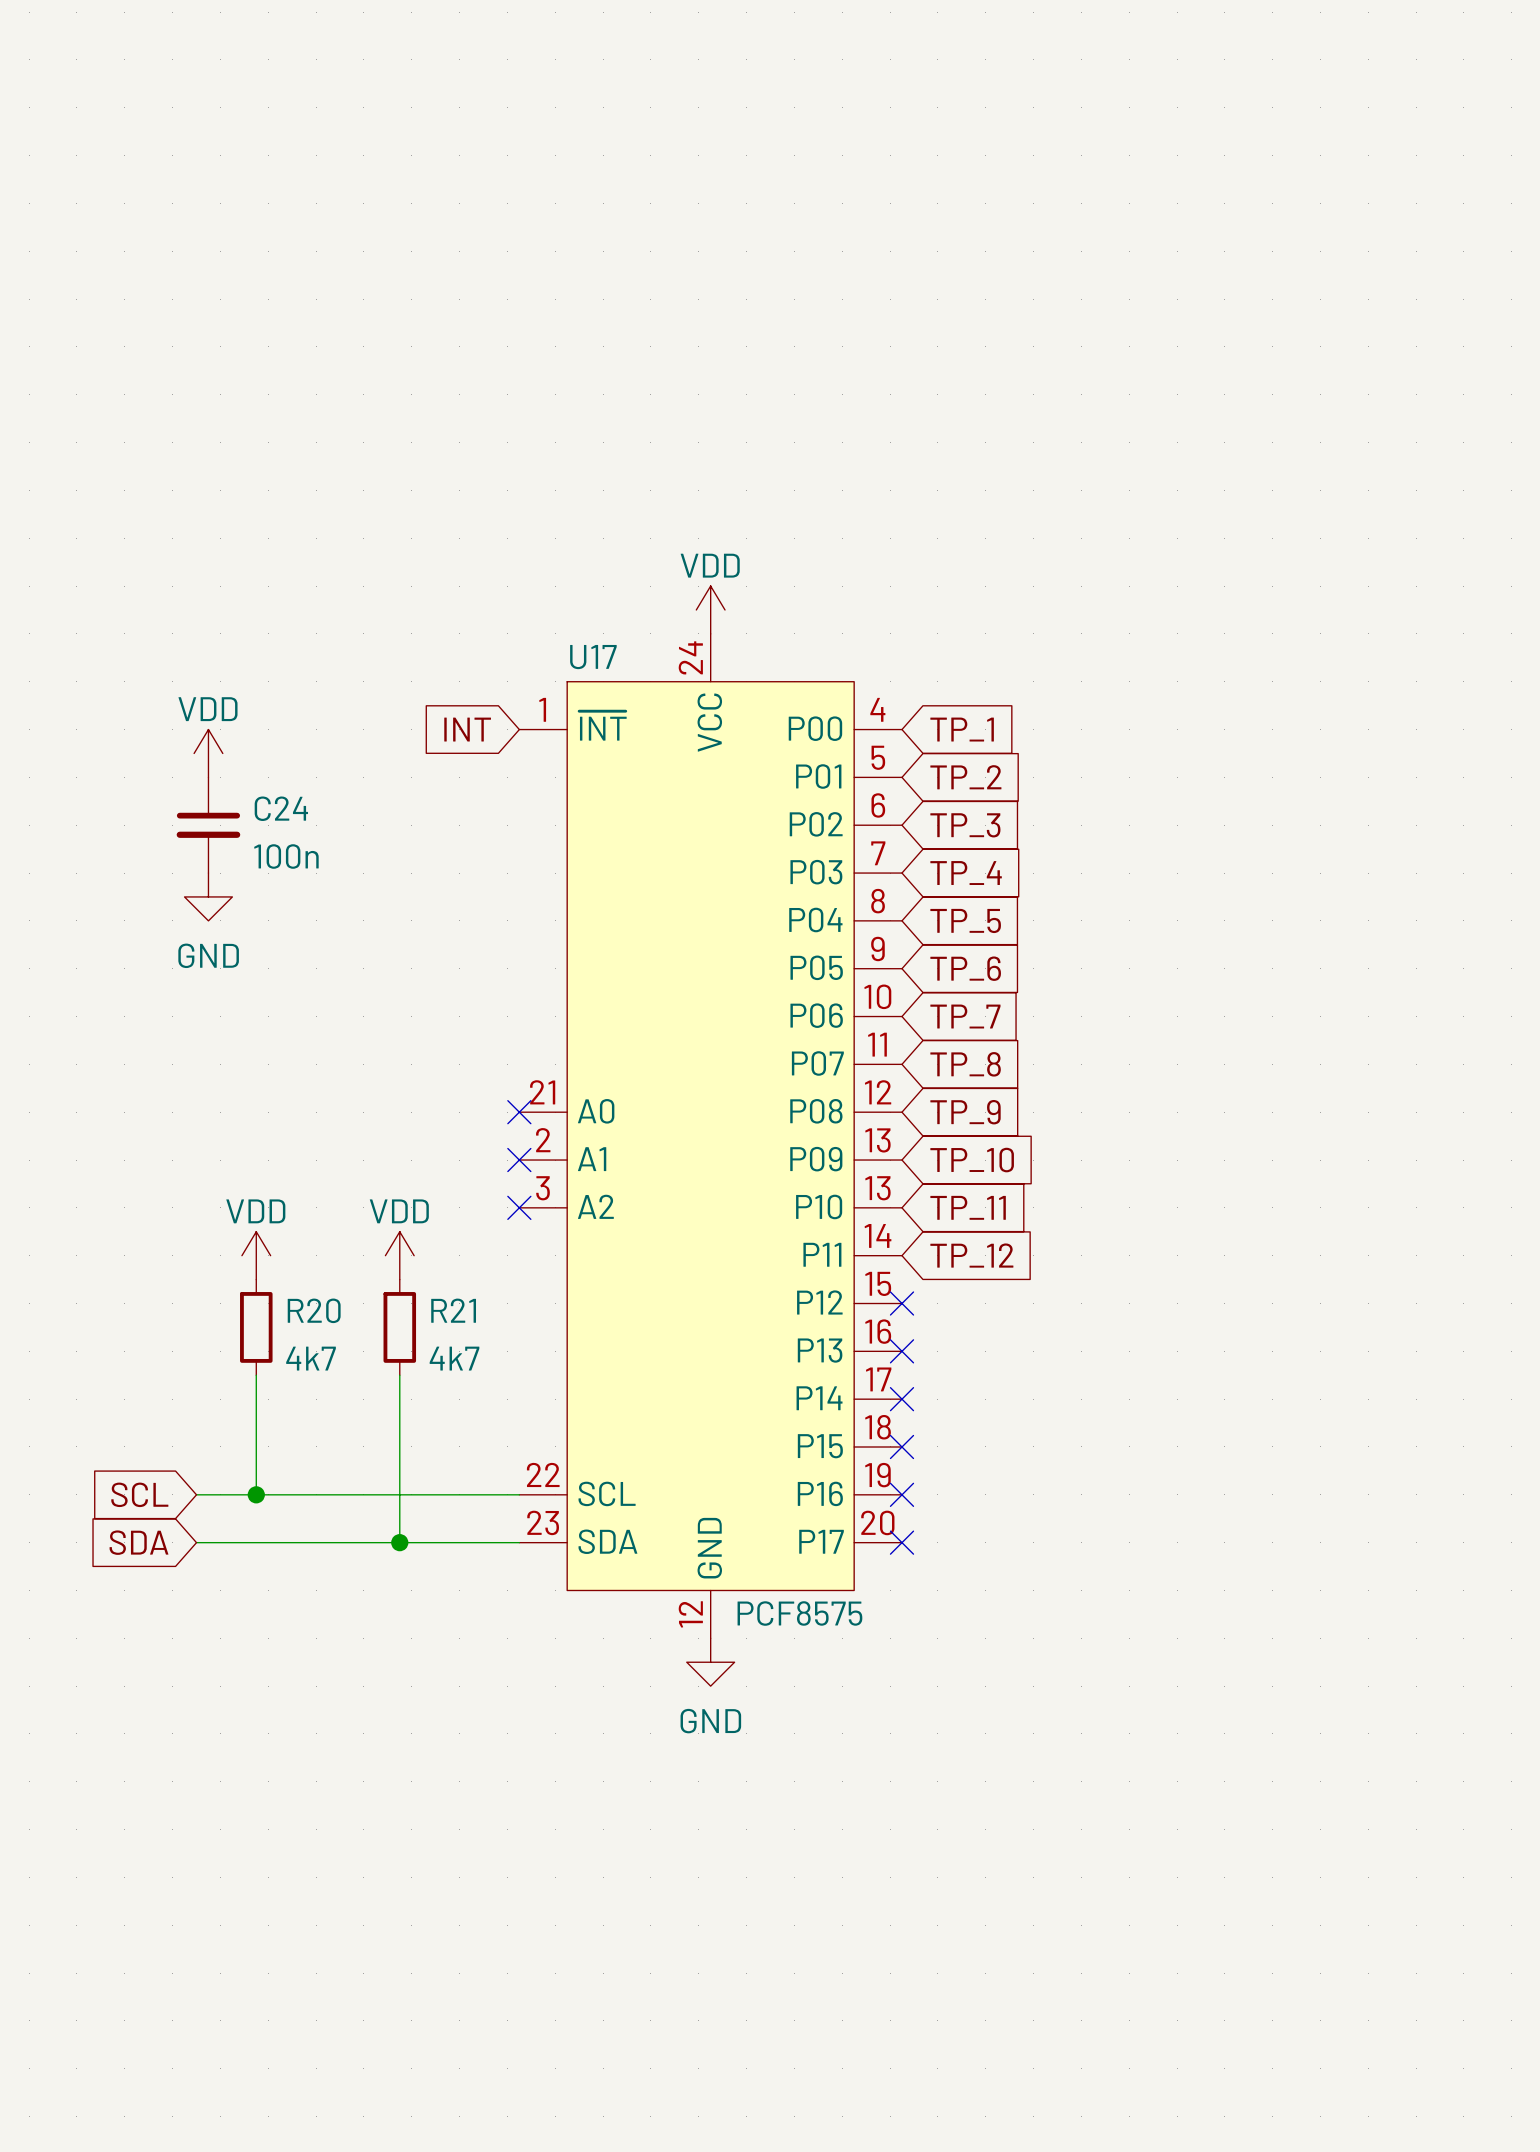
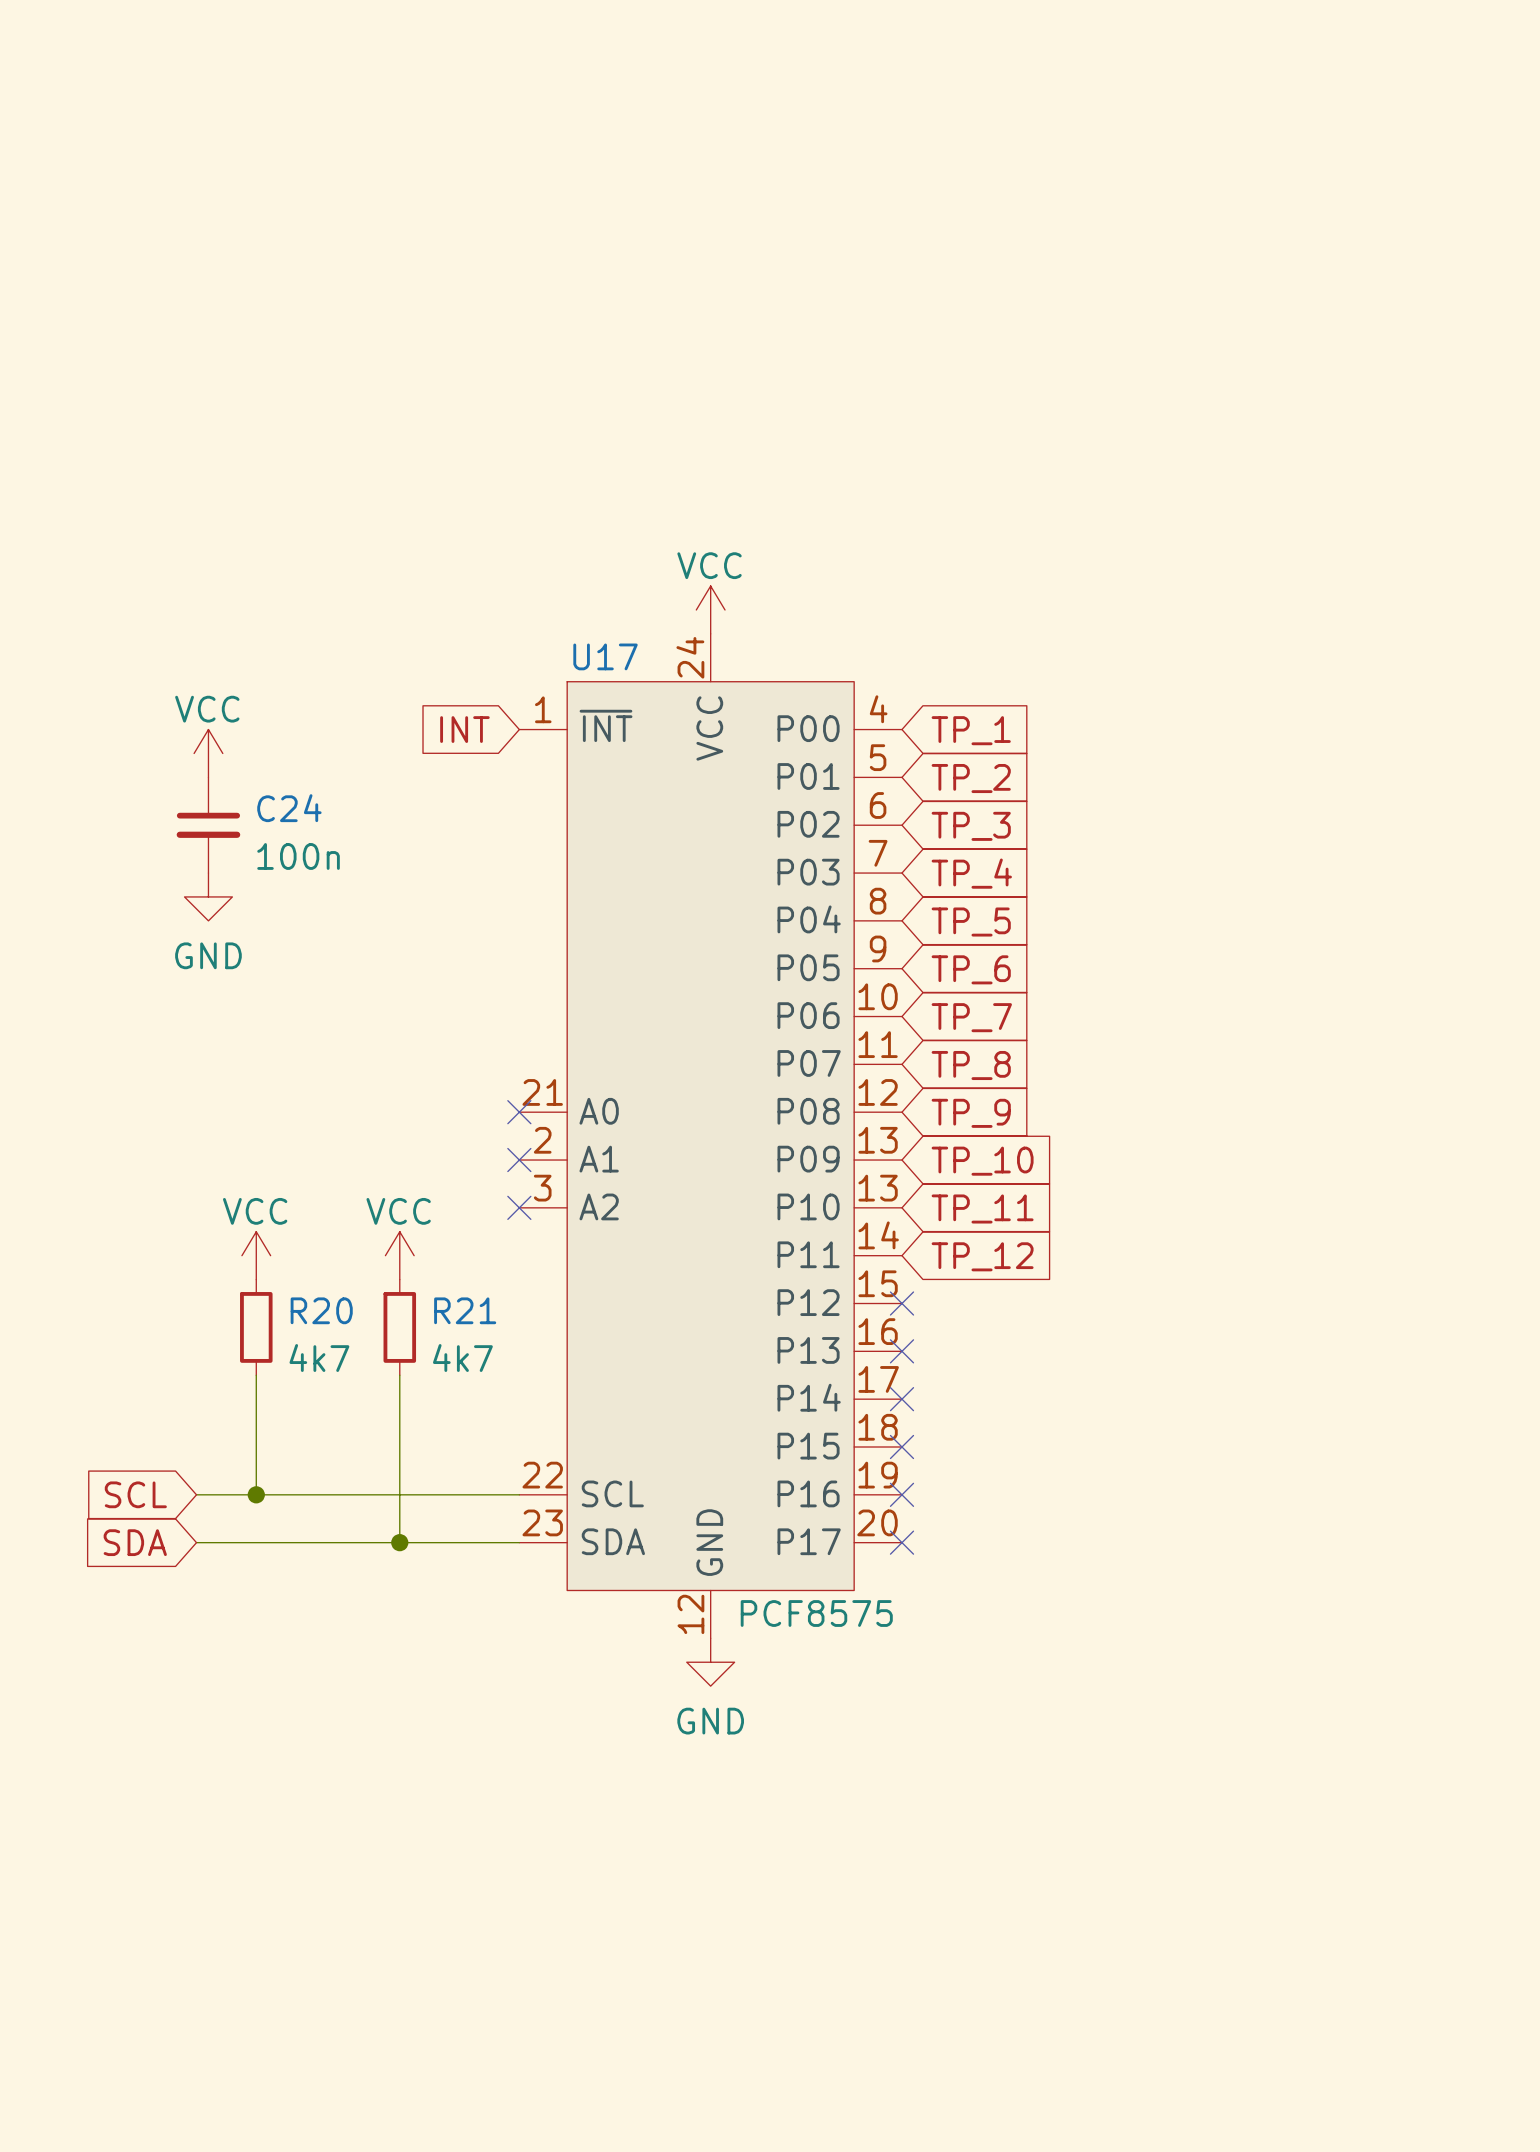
power symbol: VDD (710, 609) -> VCC (710, 609)
power symbol: VDD (208, 753) -> VCC (208, 753)
power symbol: VDD (256, 1255) -> VCC (256, 1255)
power symbol: VDD (399, 1255) -> VCC (399, 1255)

